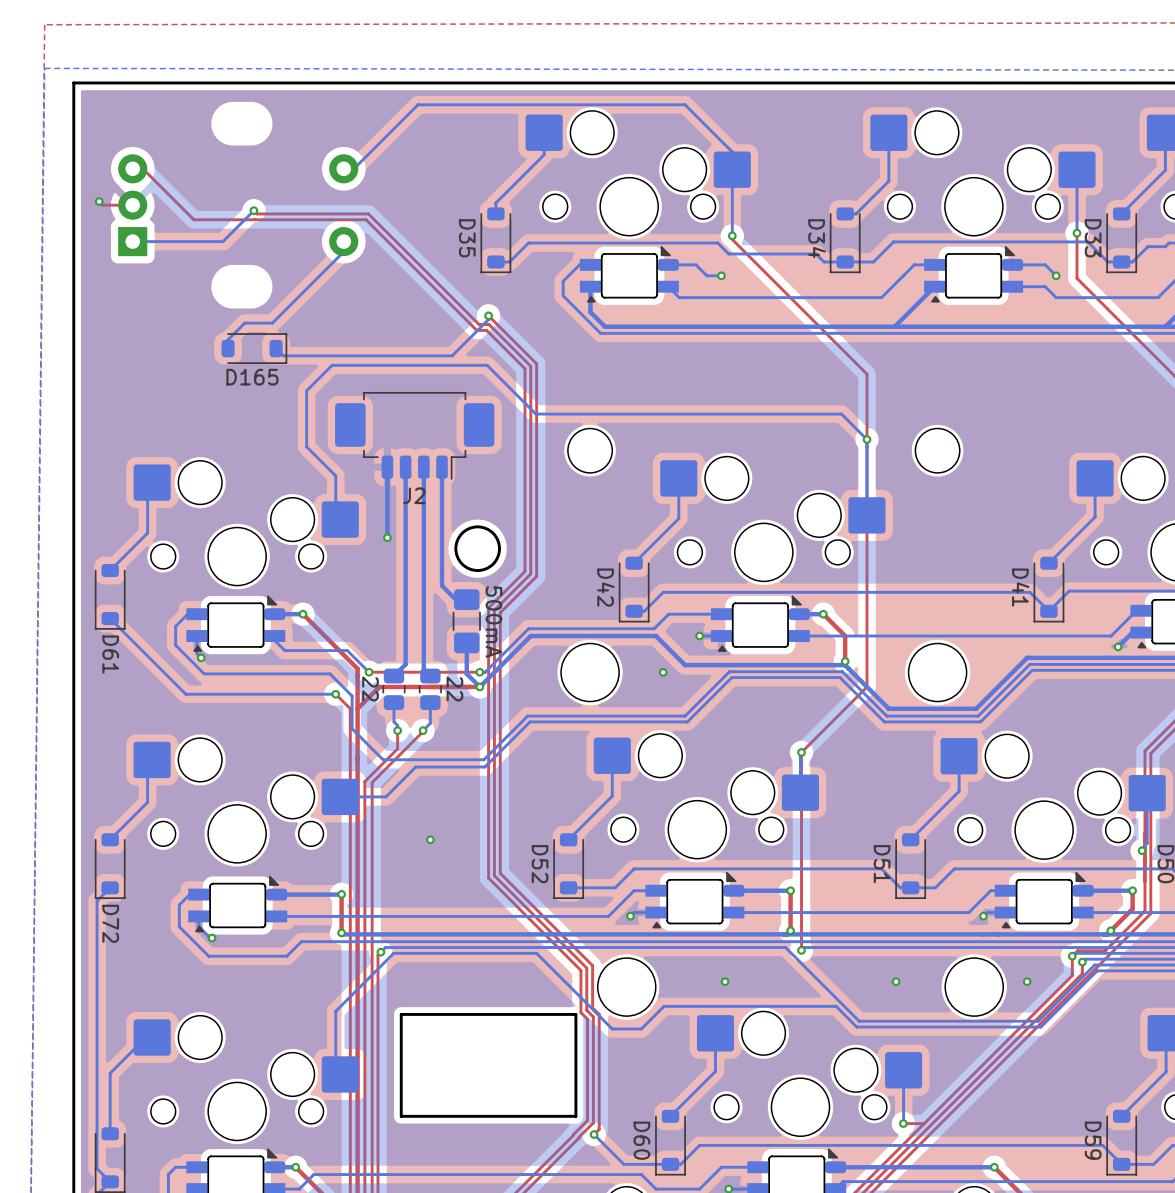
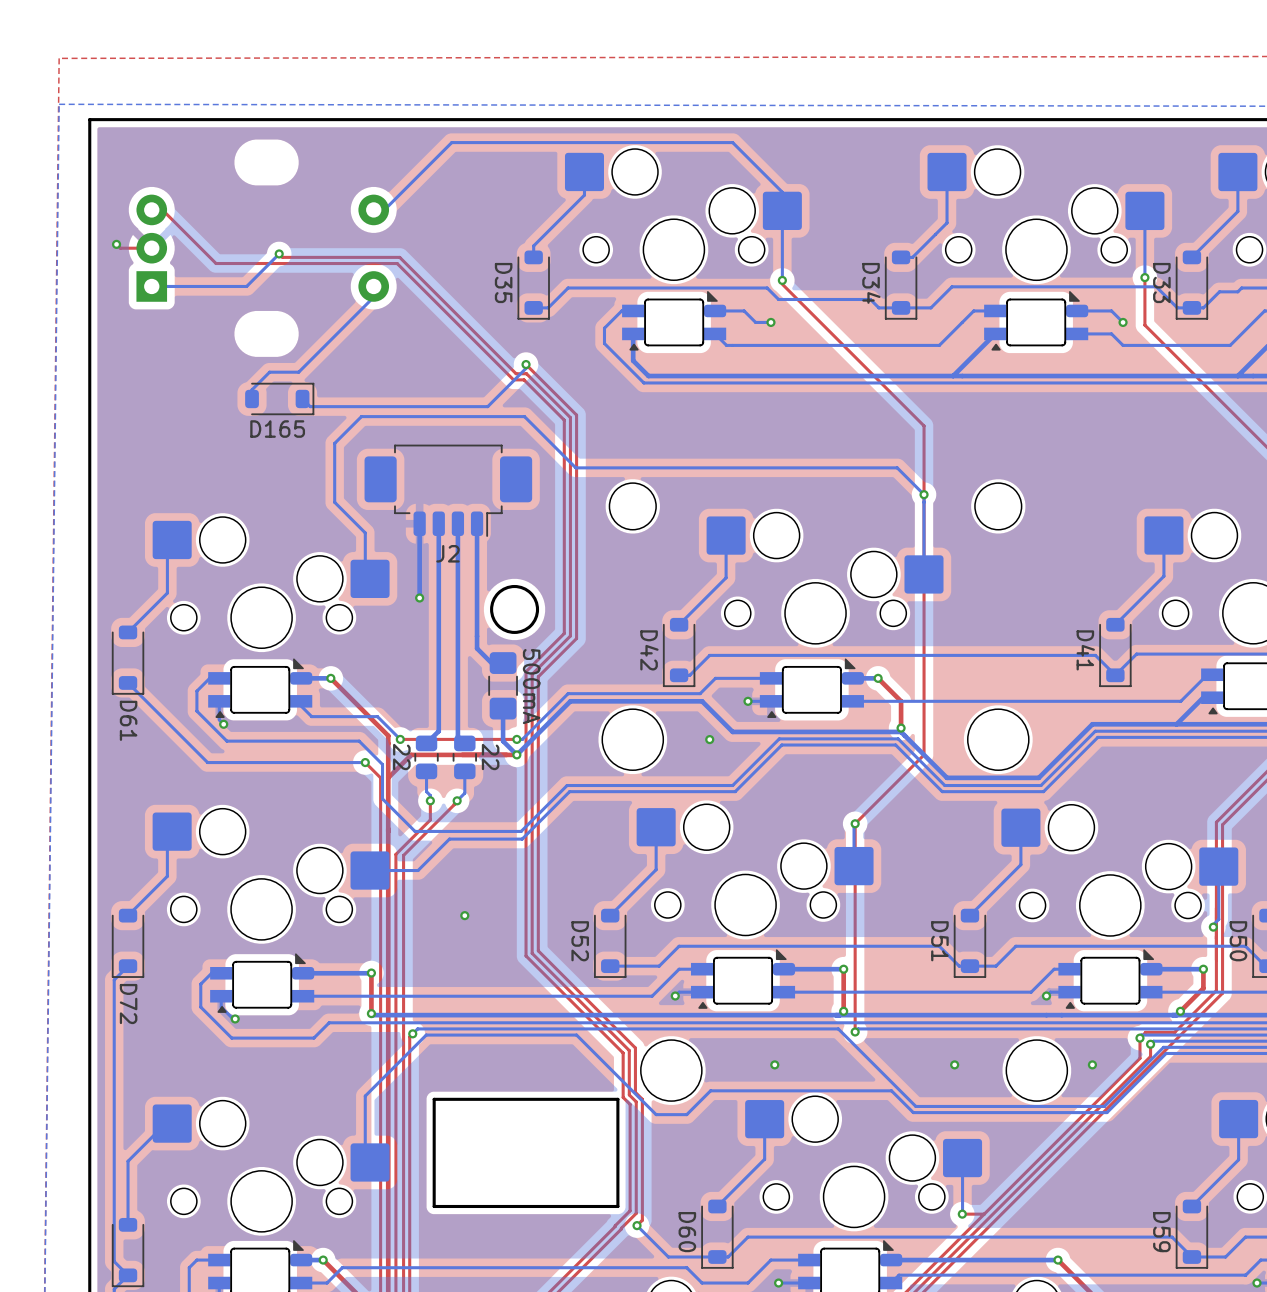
bottom track: none -> (1188, 712) (1176, 724)
via: (1118, 646) -> none

